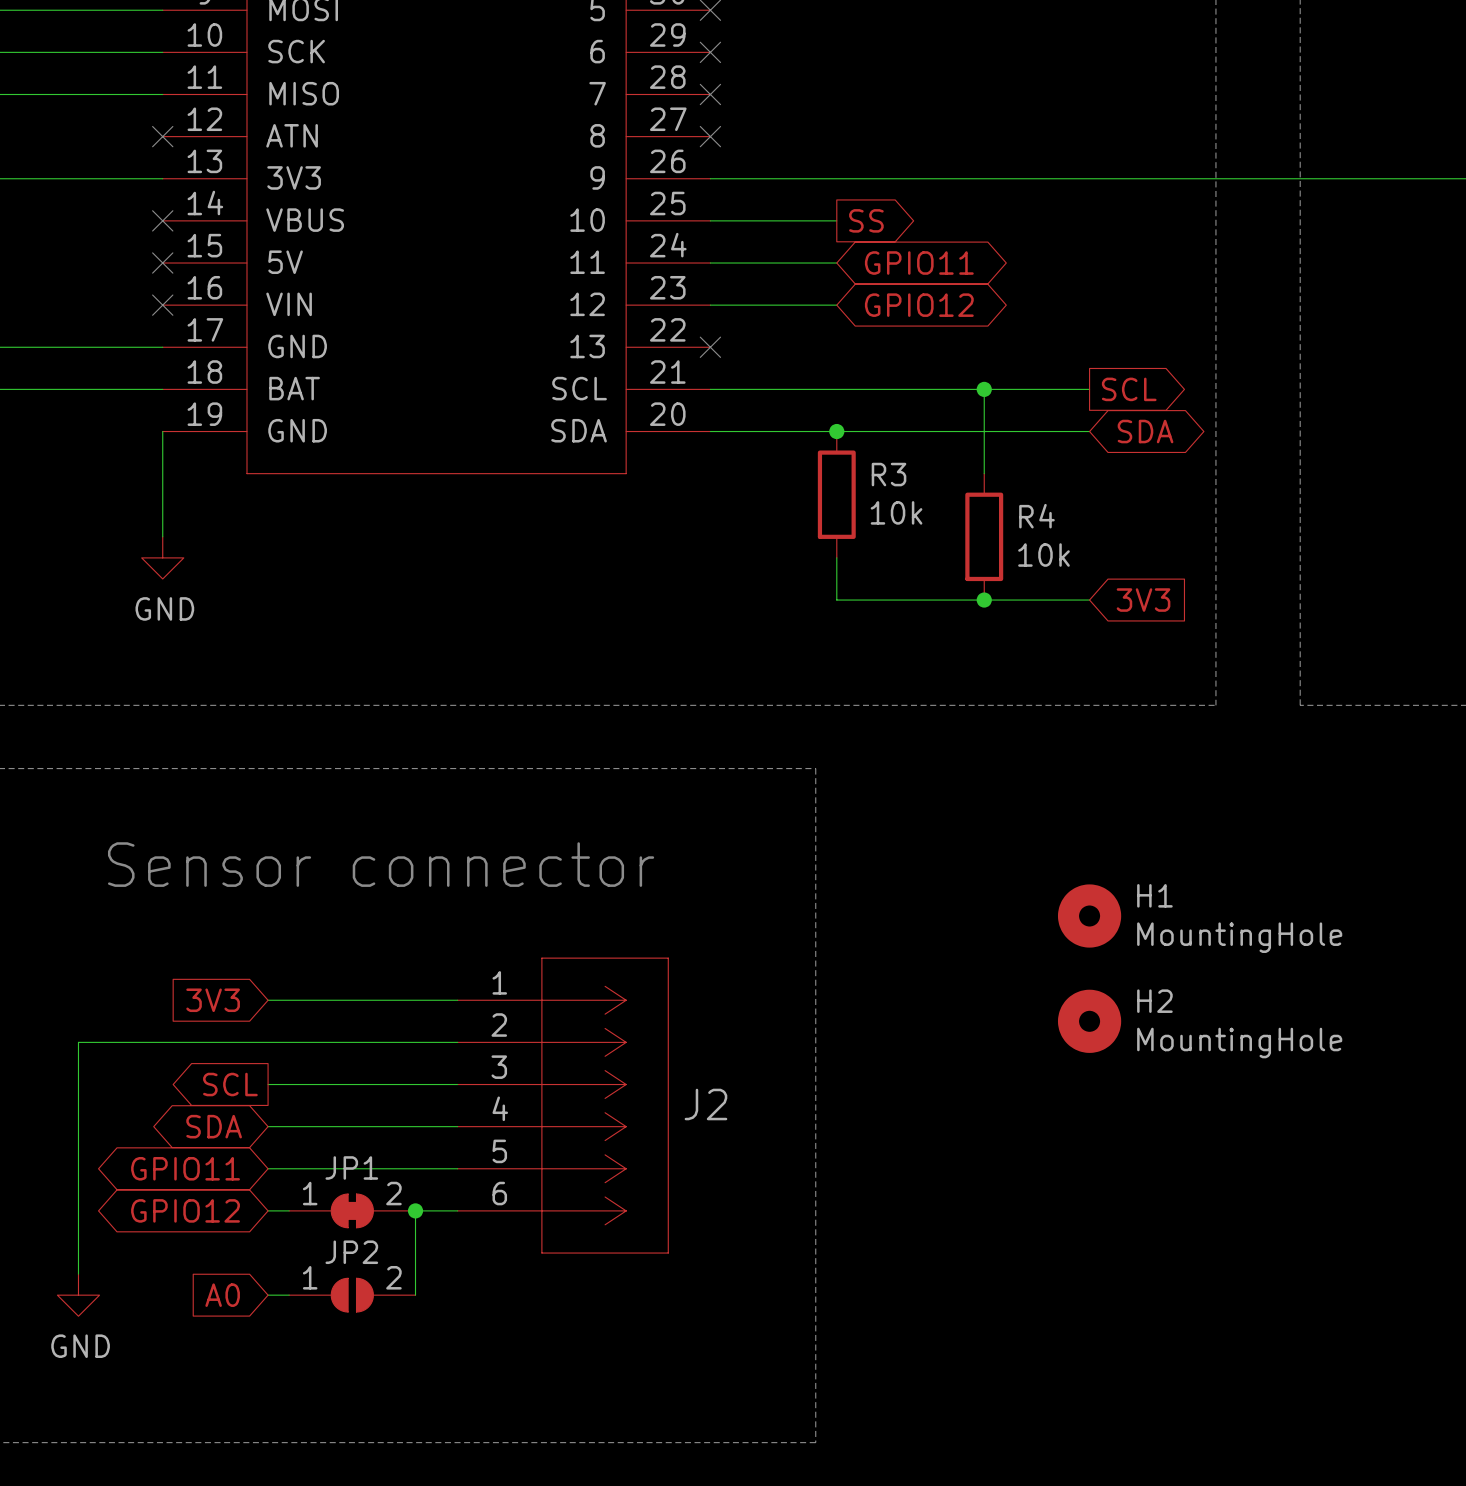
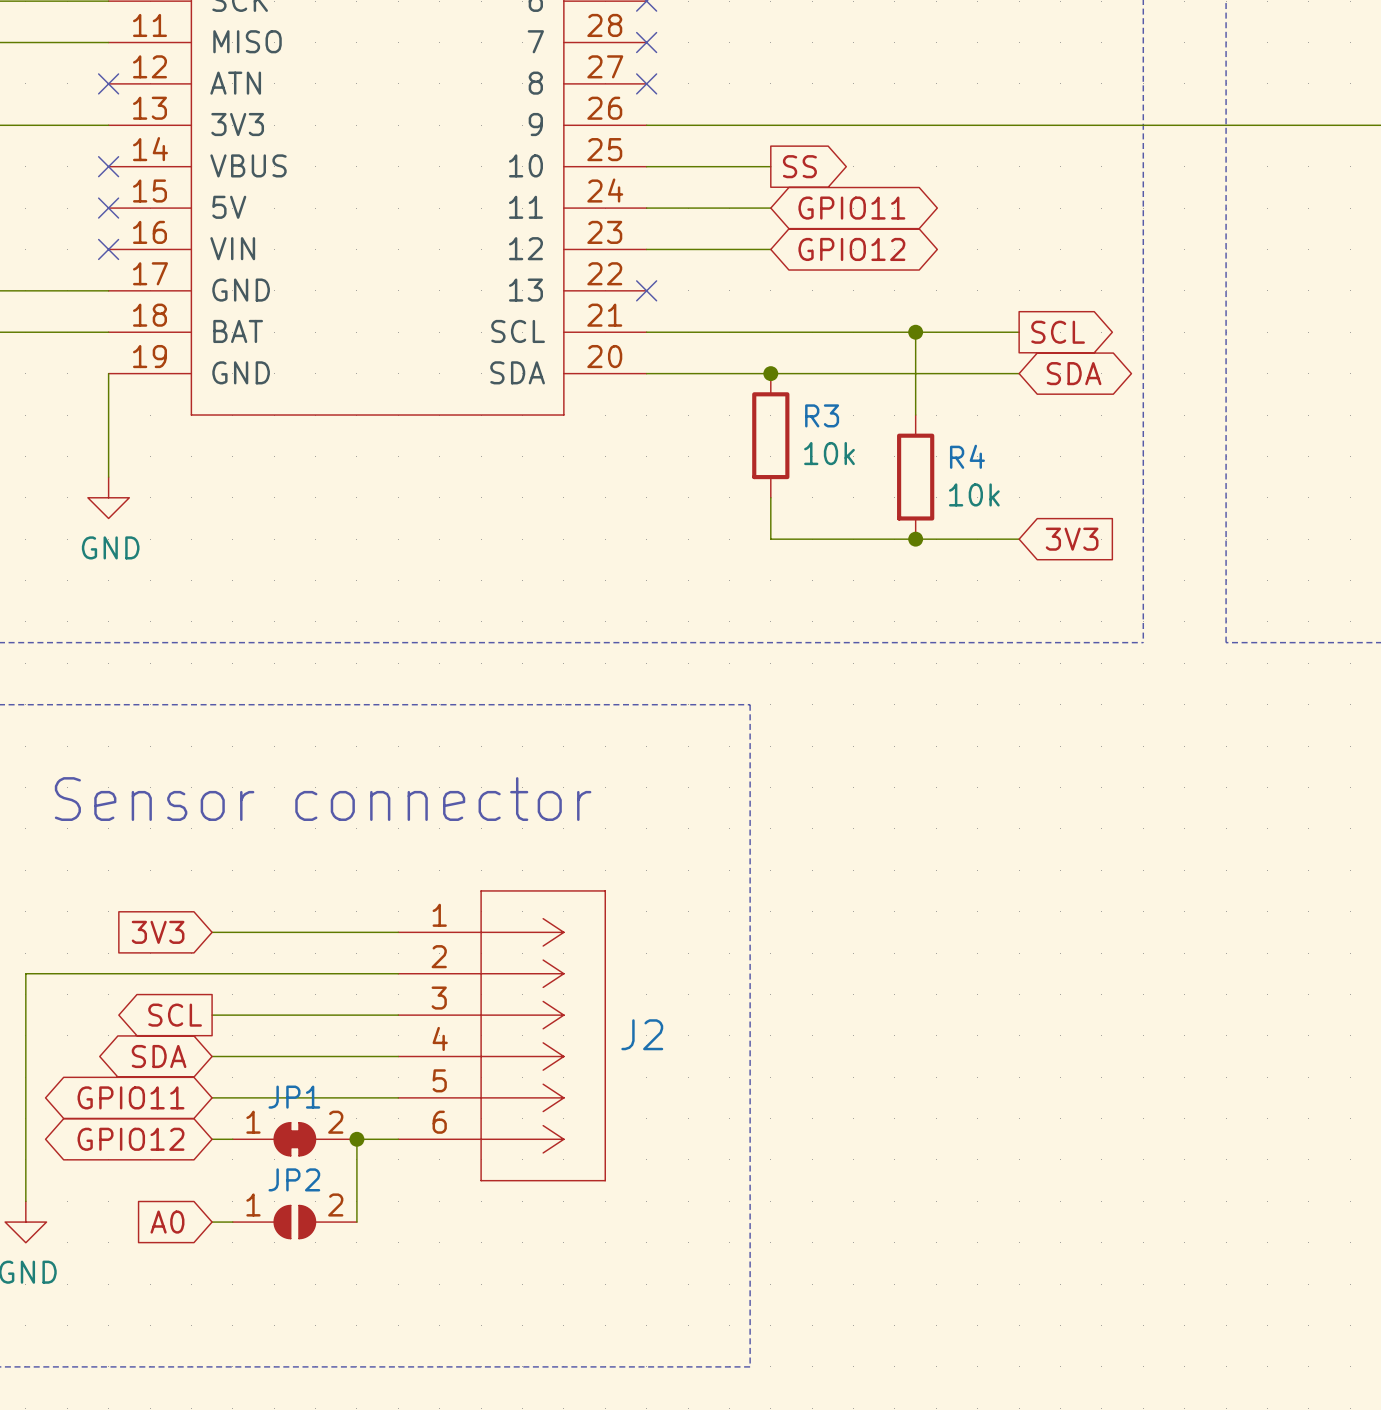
H1: MountingHole (1089, 916) -> none
H2: MountingHole (1089, 1021) -> none

